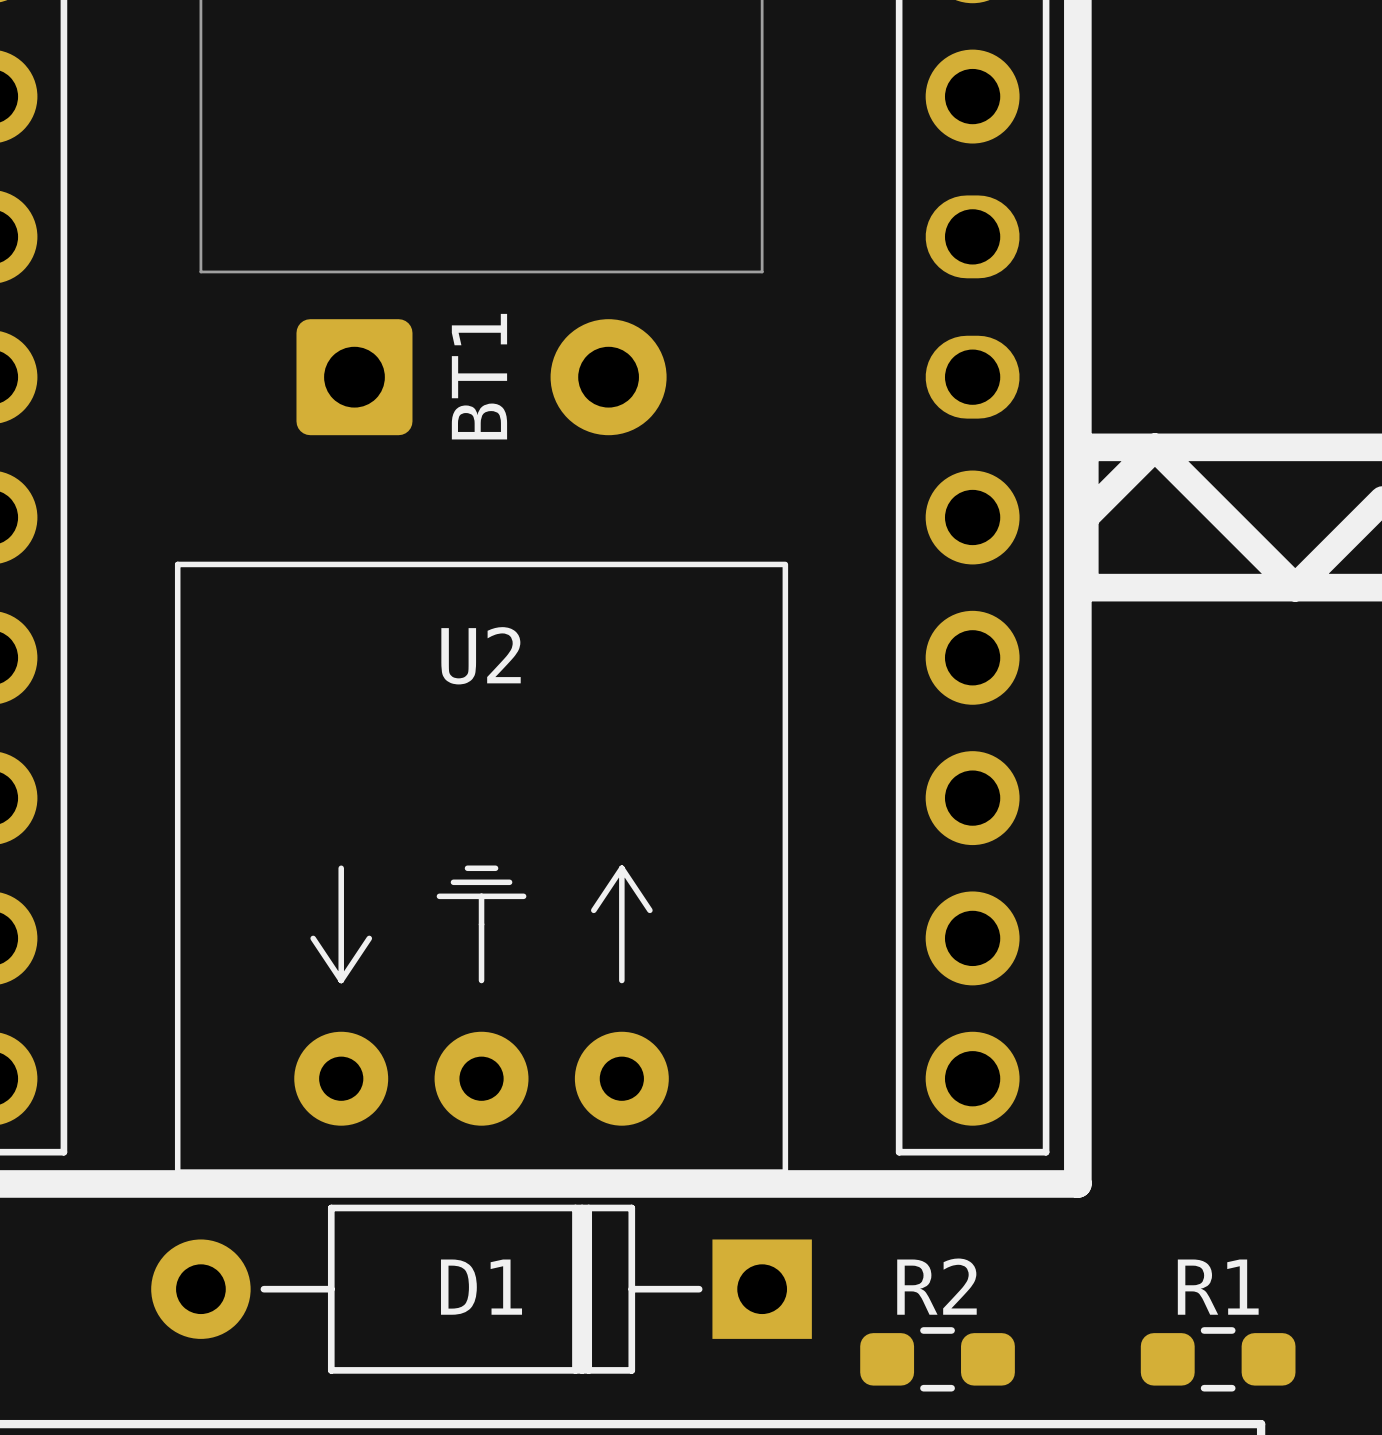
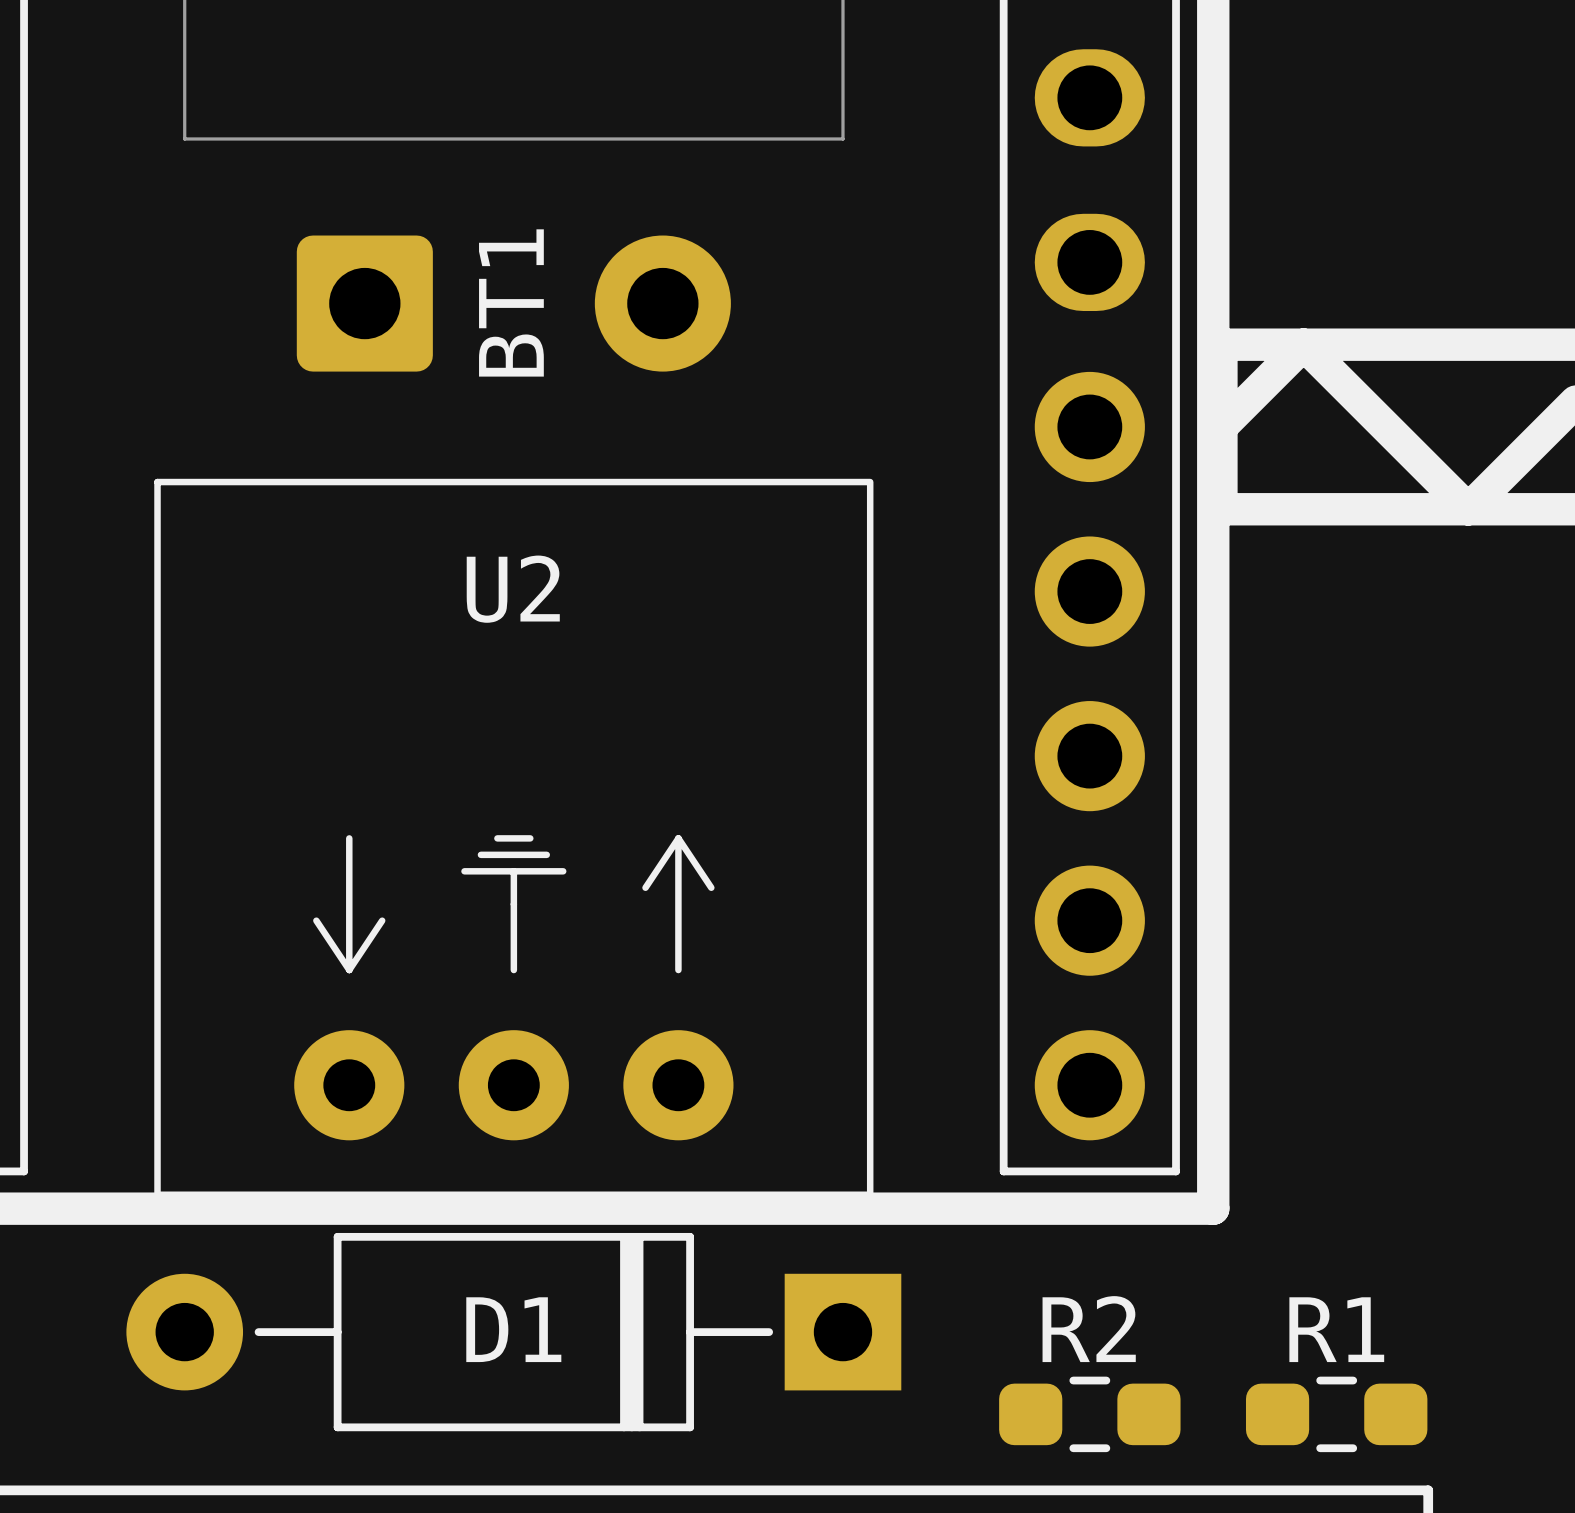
BT1 position: (481, 377) -> (513, 303)
R2 position: (937, 1359) -> (1089, 1414)
R1 position: (1218, 1359) -> (1336, 1414)

